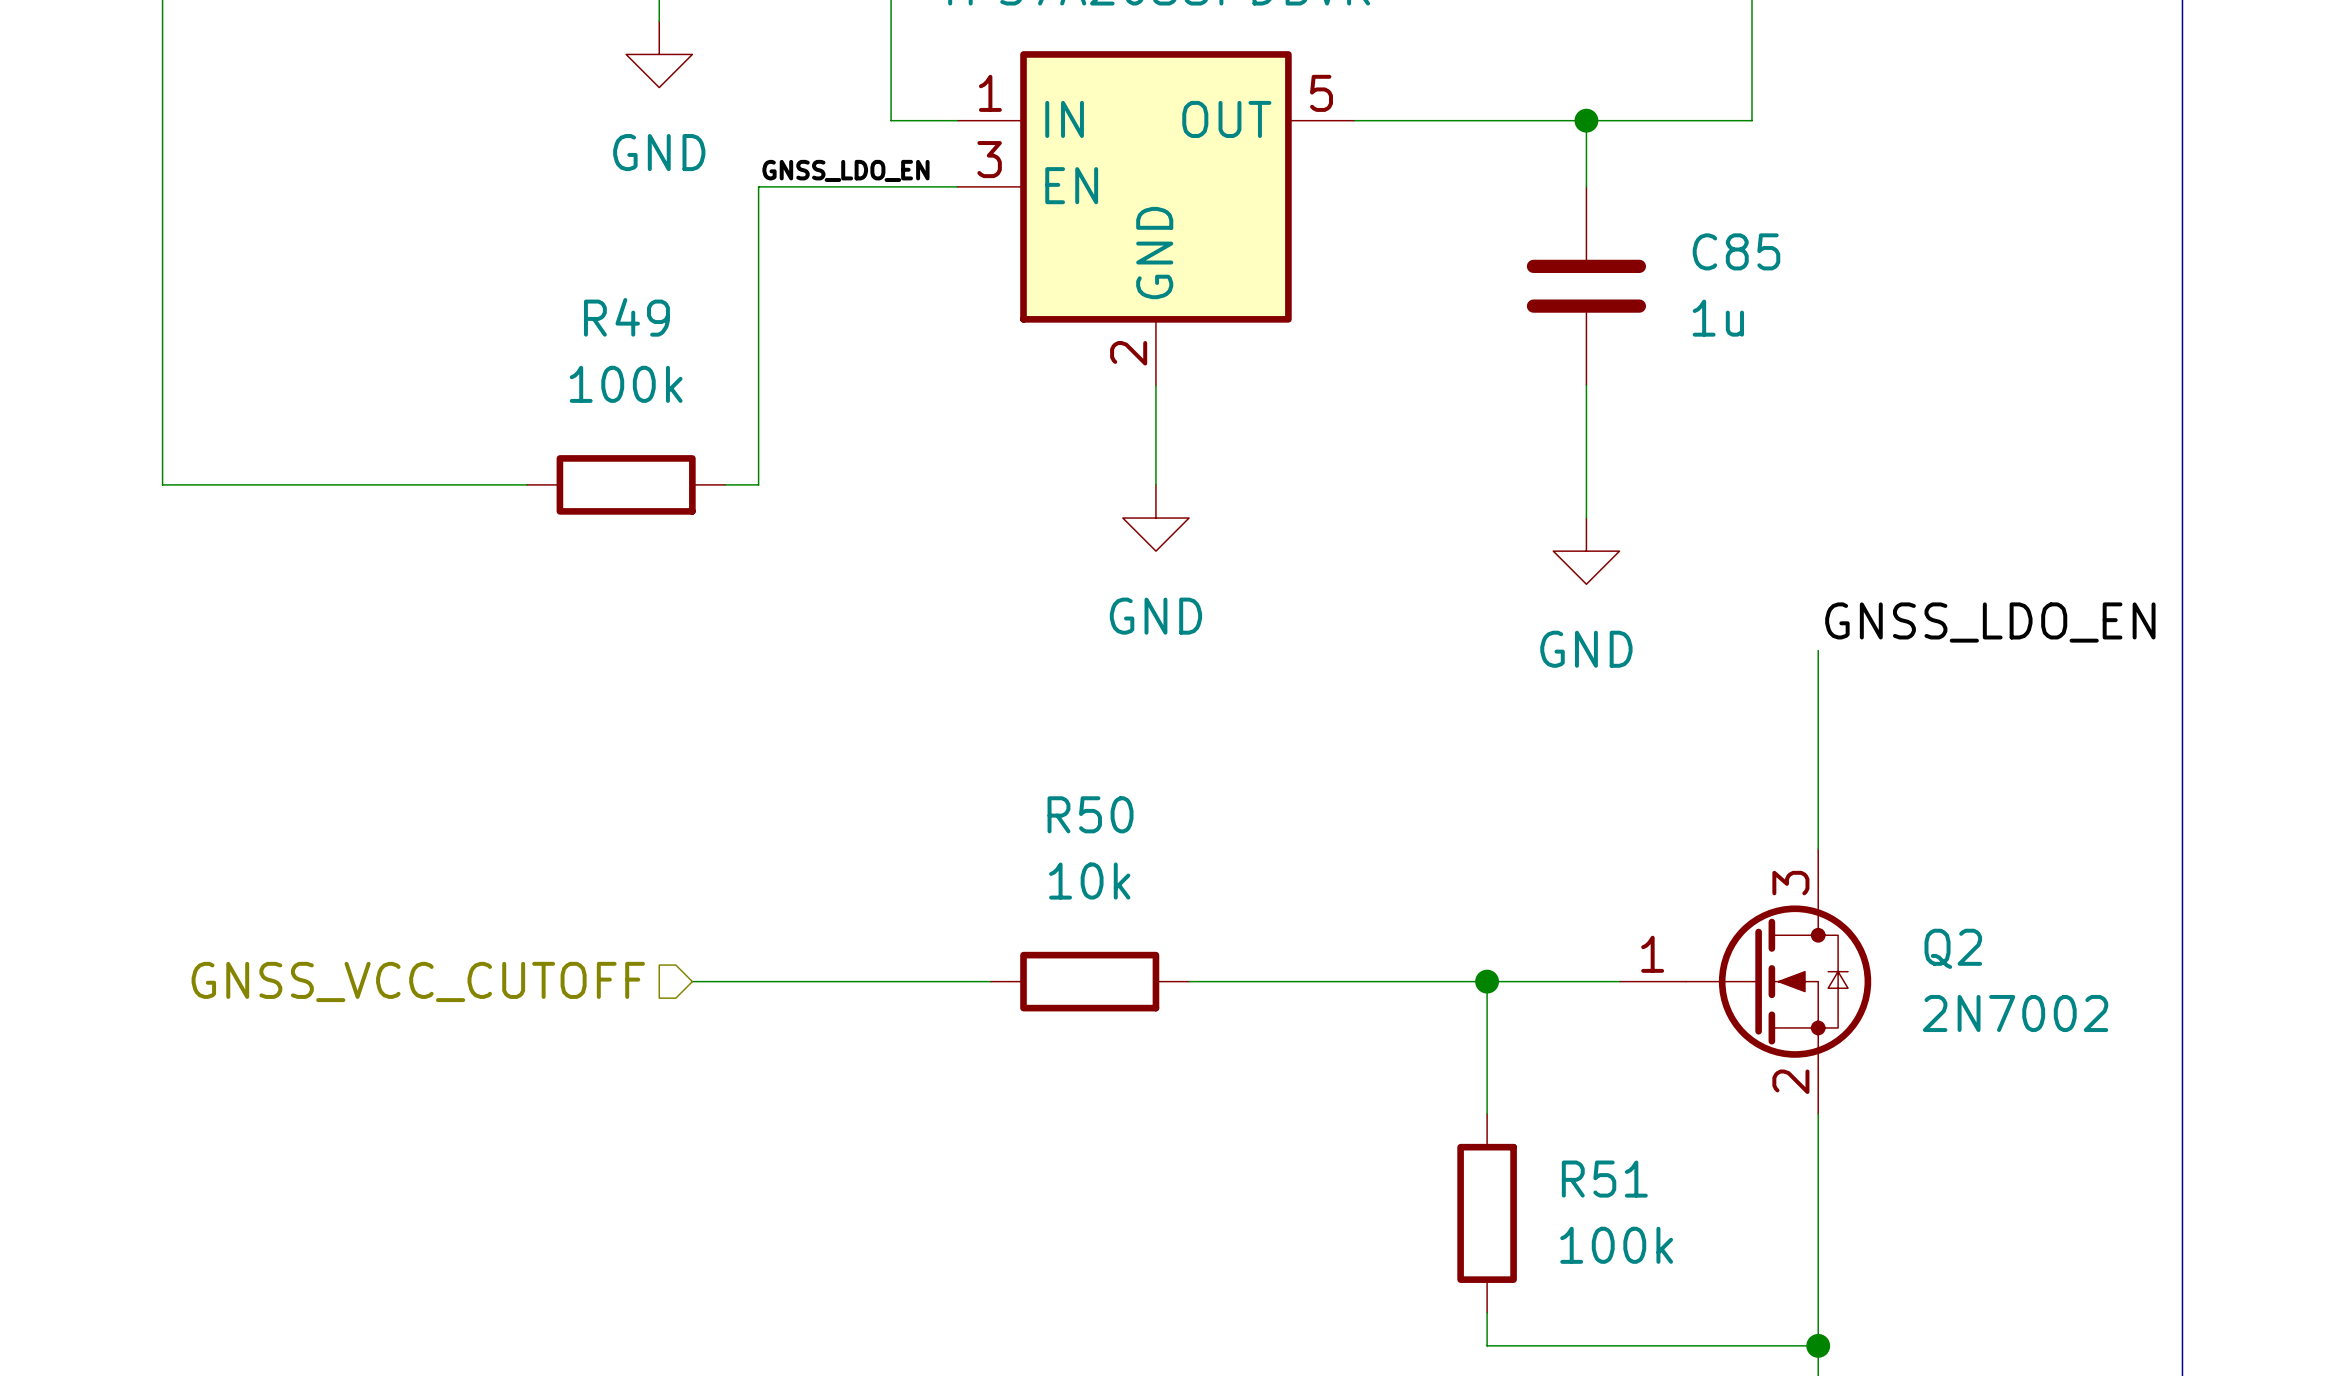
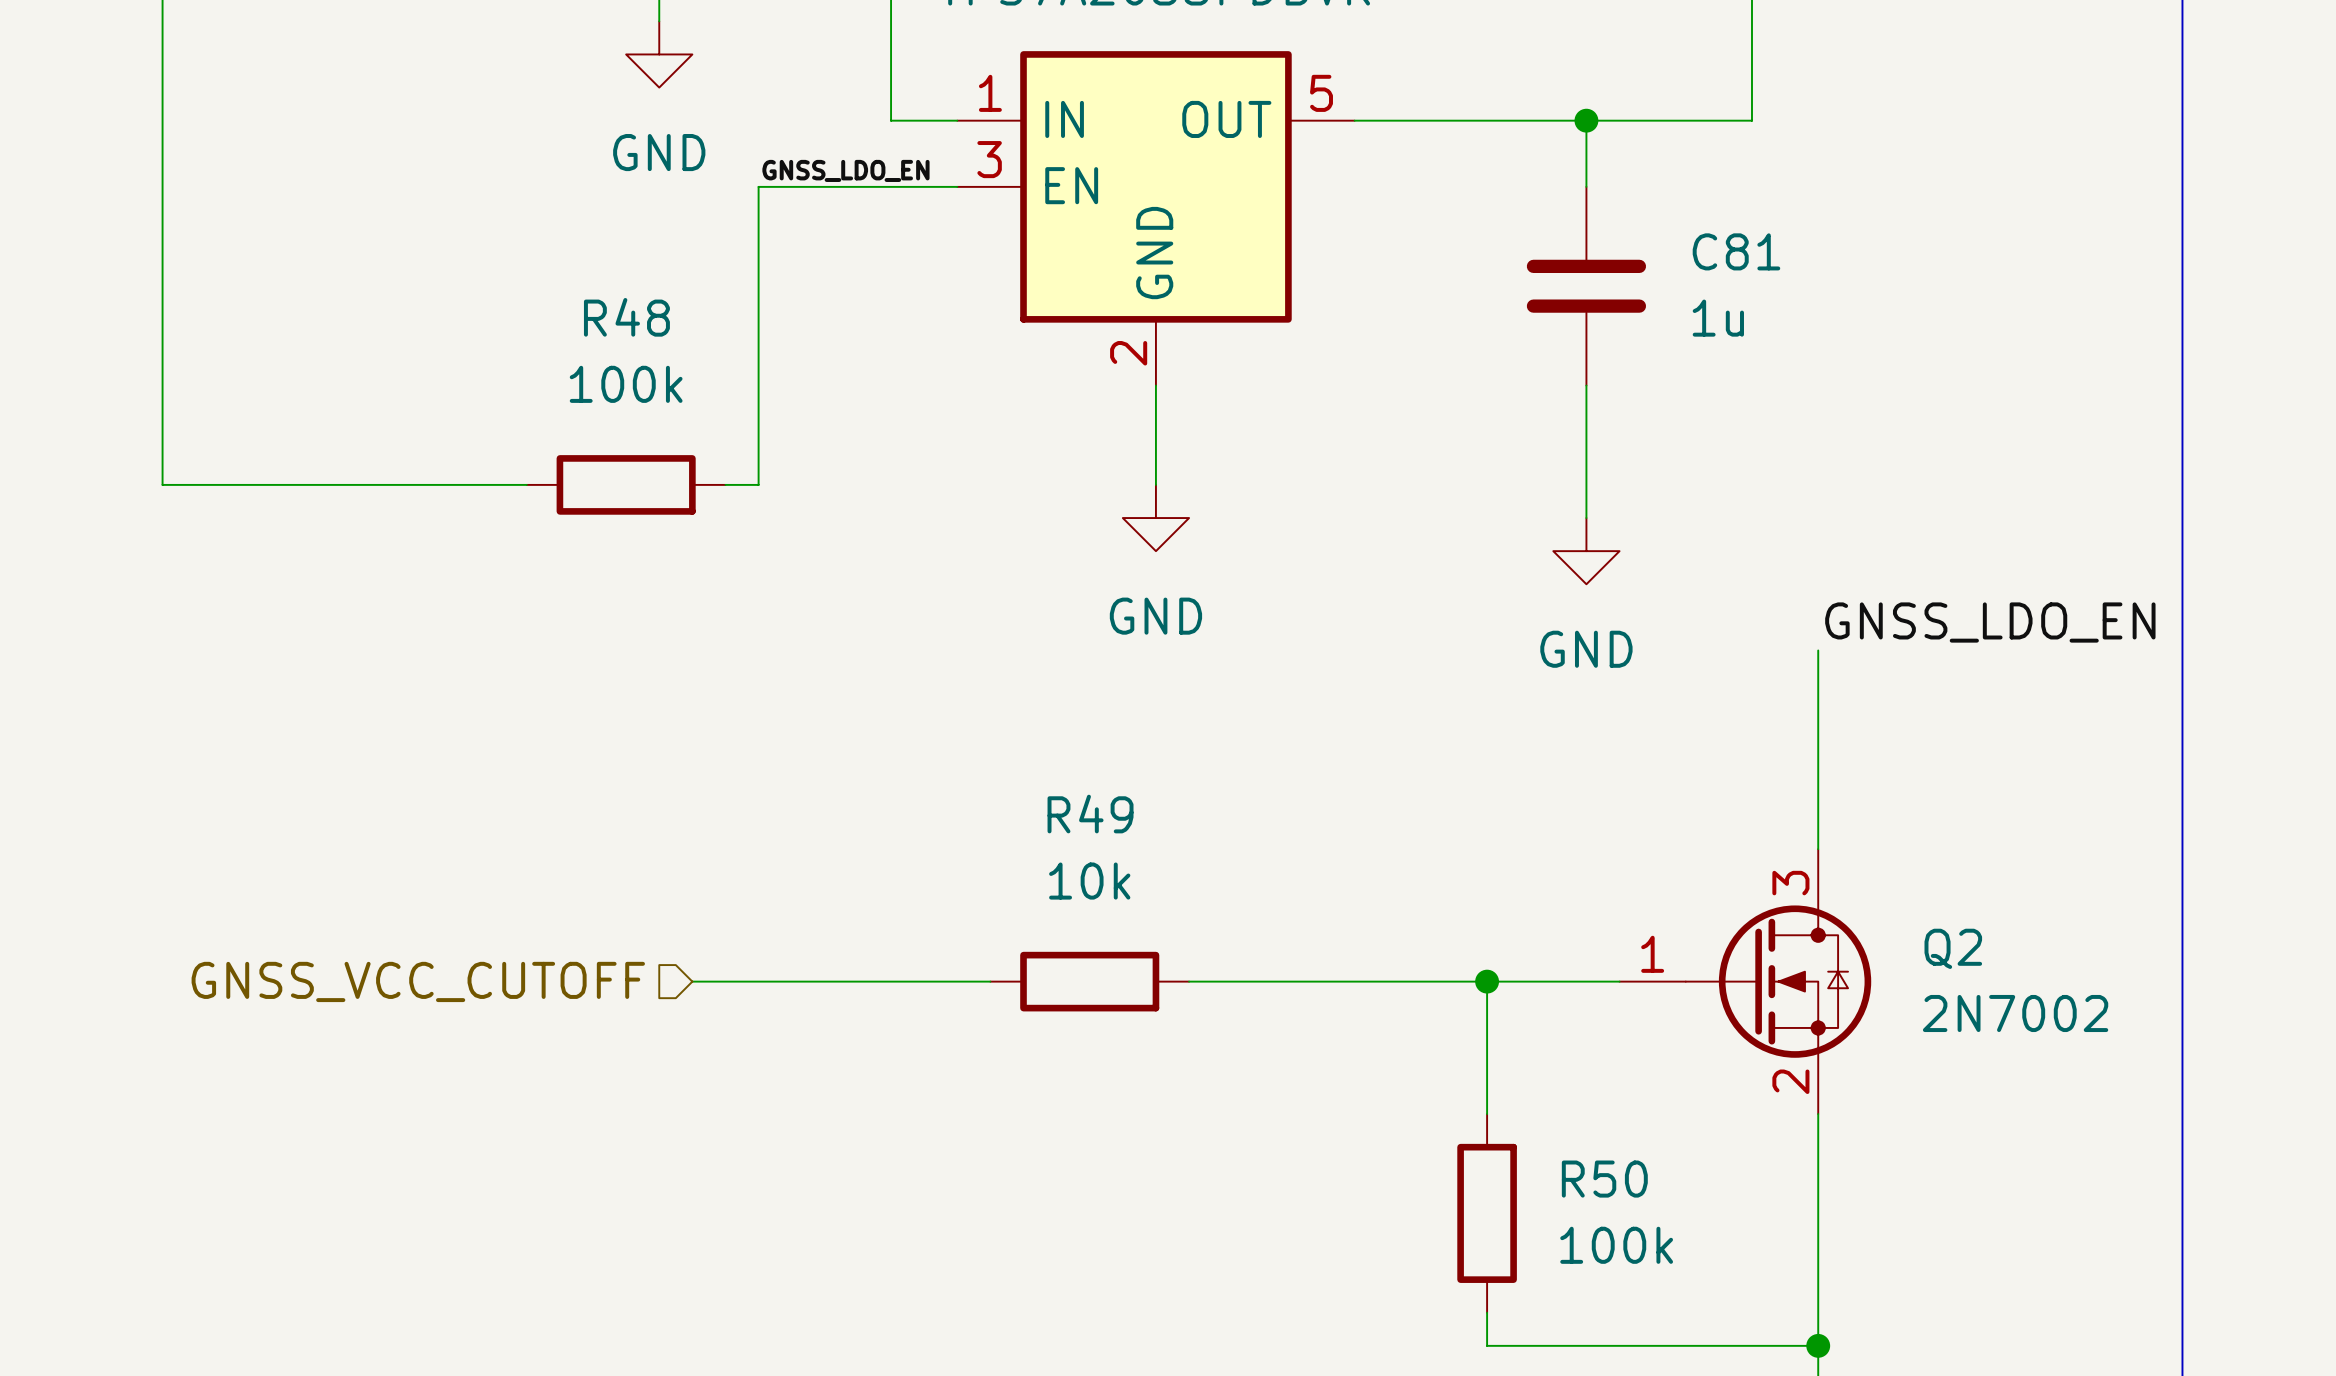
C85 name: C85 (1736, 251) -> C81 (1736, 251)
R49 name: R49 (626, 317) -> R48 (626, 317)
R50 name: R50 (1090, 814) -> R49 (1090, 814)
R51 name: R51 (1604, 1179) -> R50 (1604, 1179)

